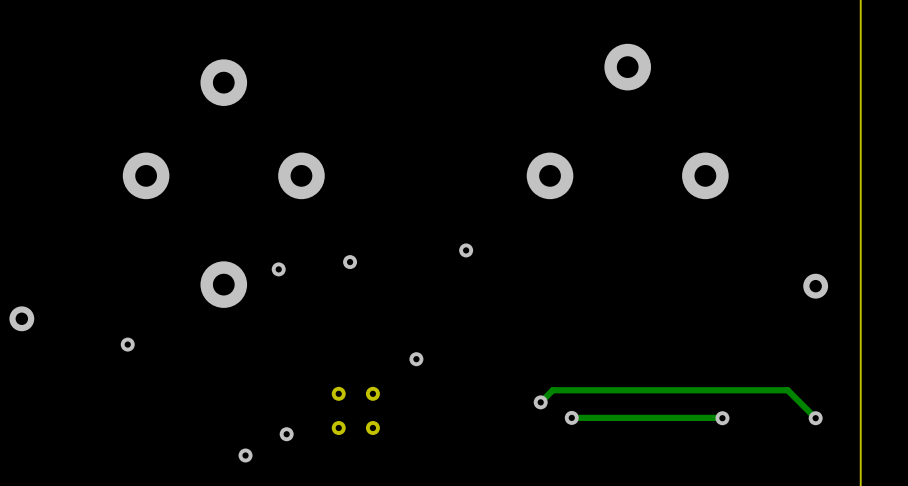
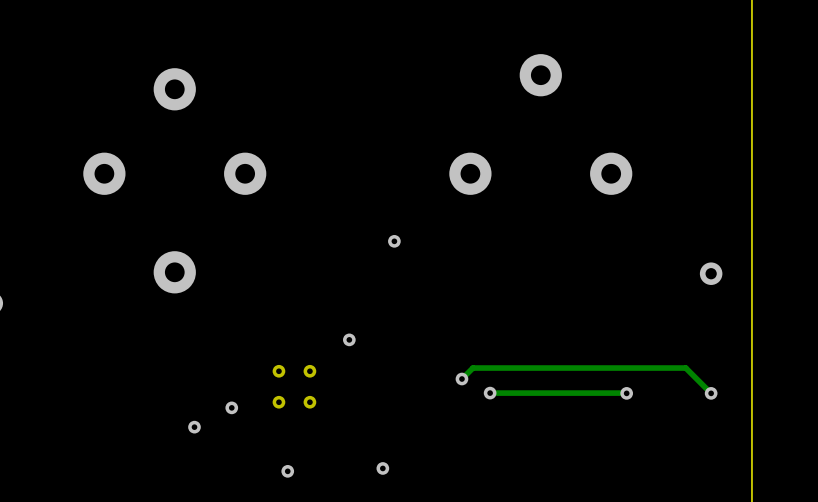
via: (350, 262) -> none
via: (278, 269) -> none
via: (127, 344) -> none

